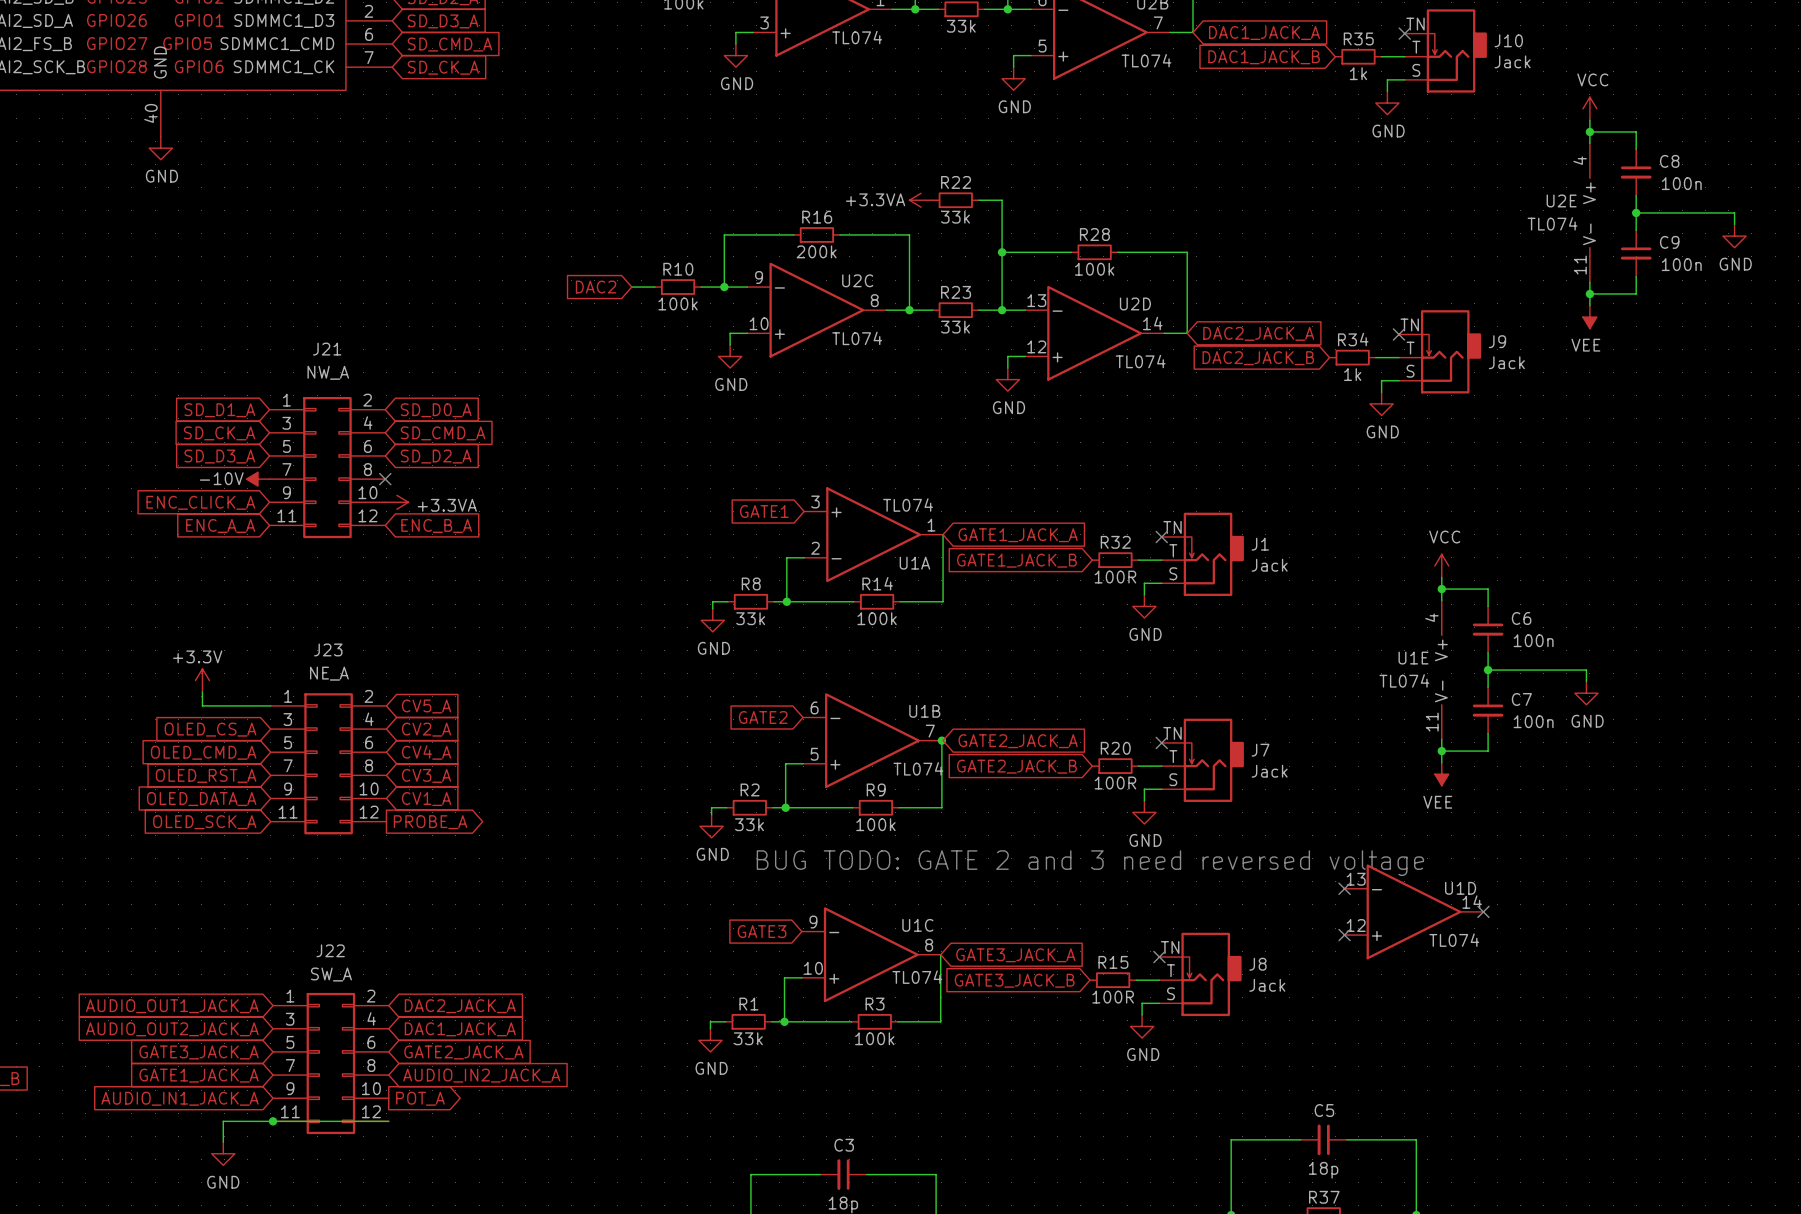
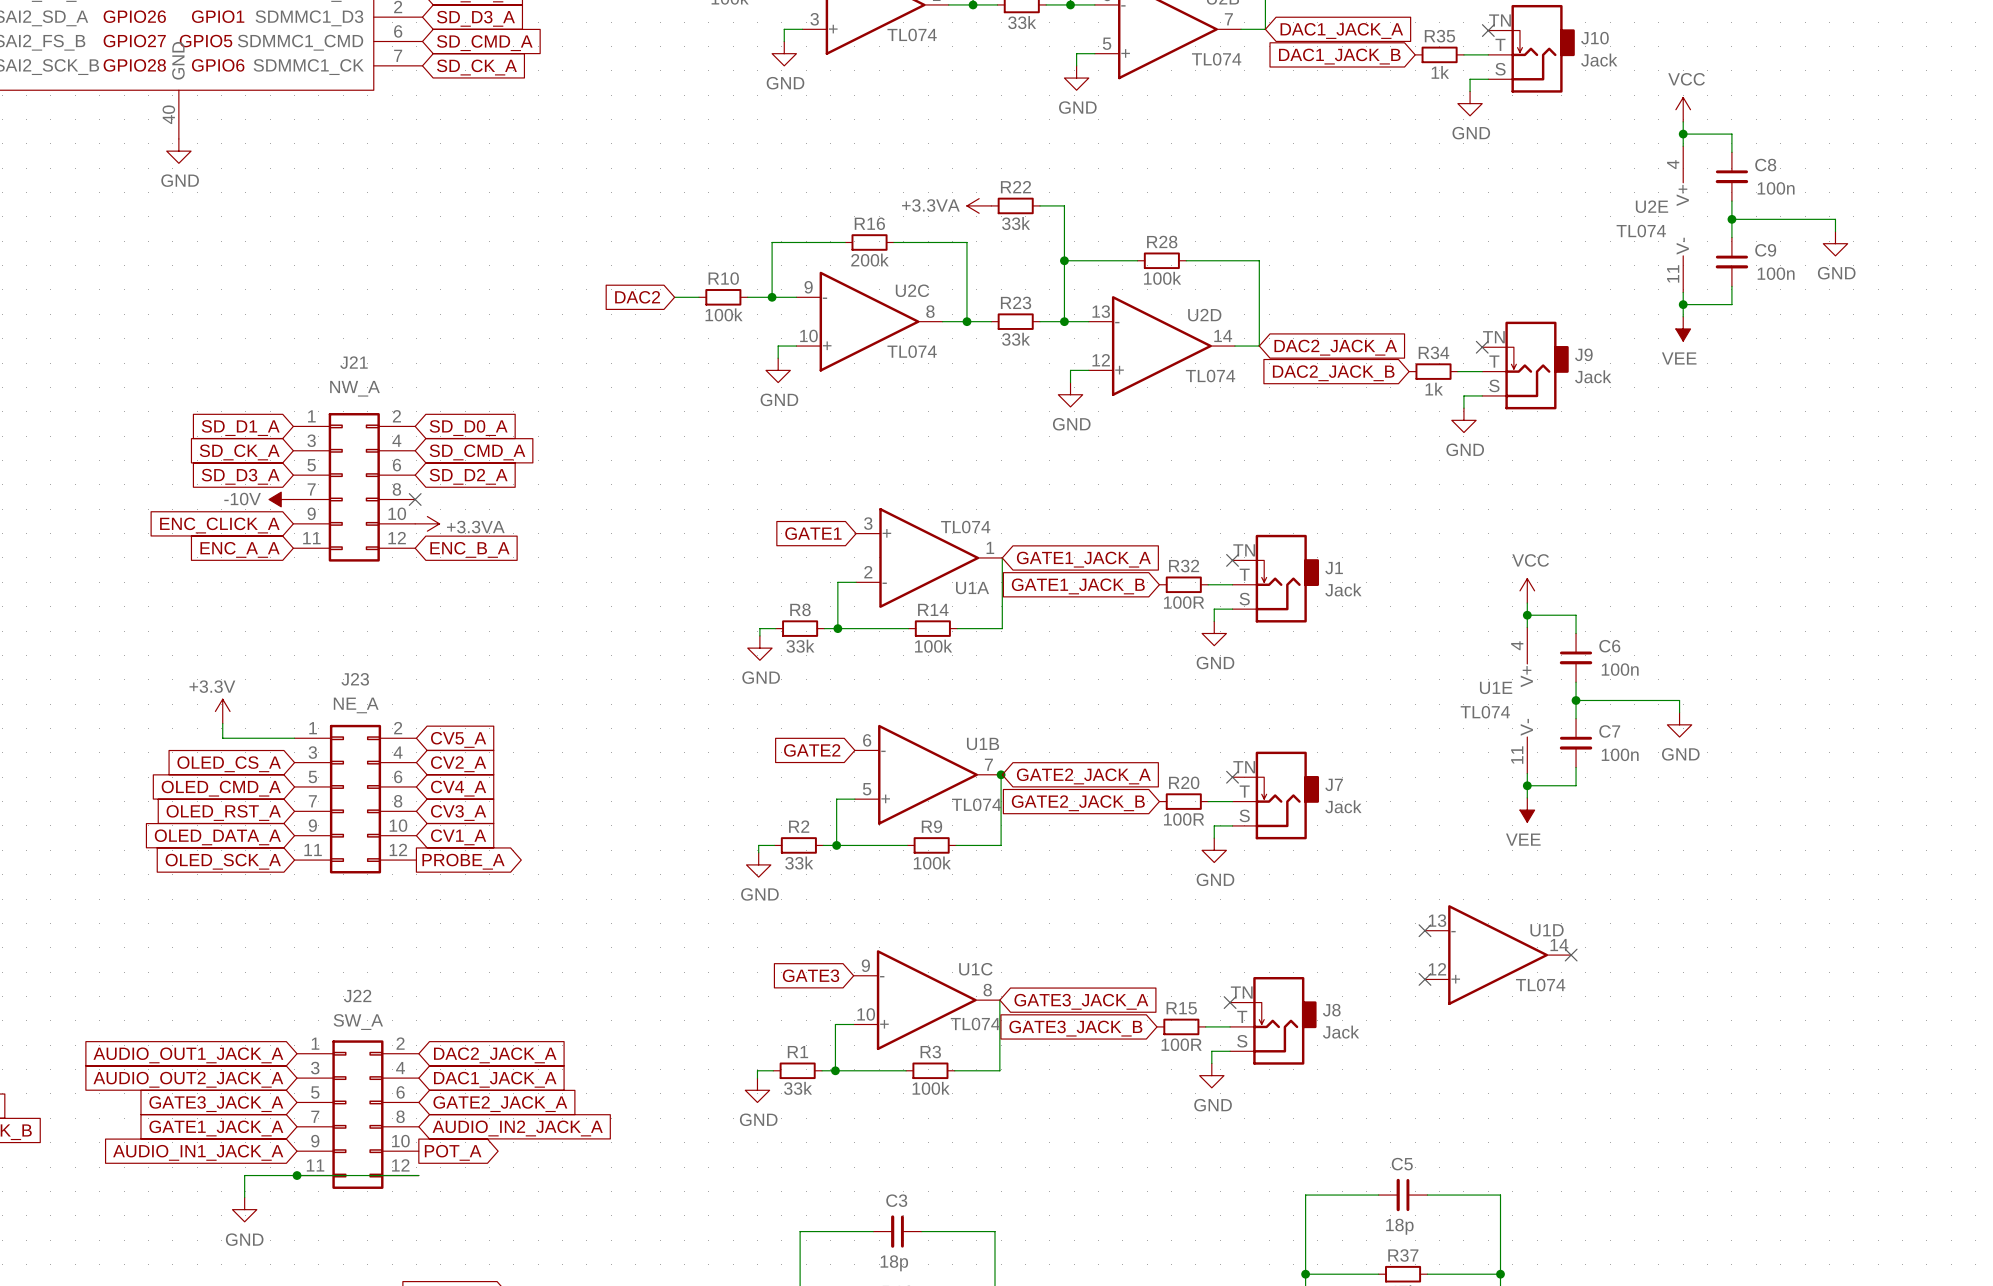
text: BUG TODO: GATE 2 and 3 need reversed voltage (1090, 863) -> none

